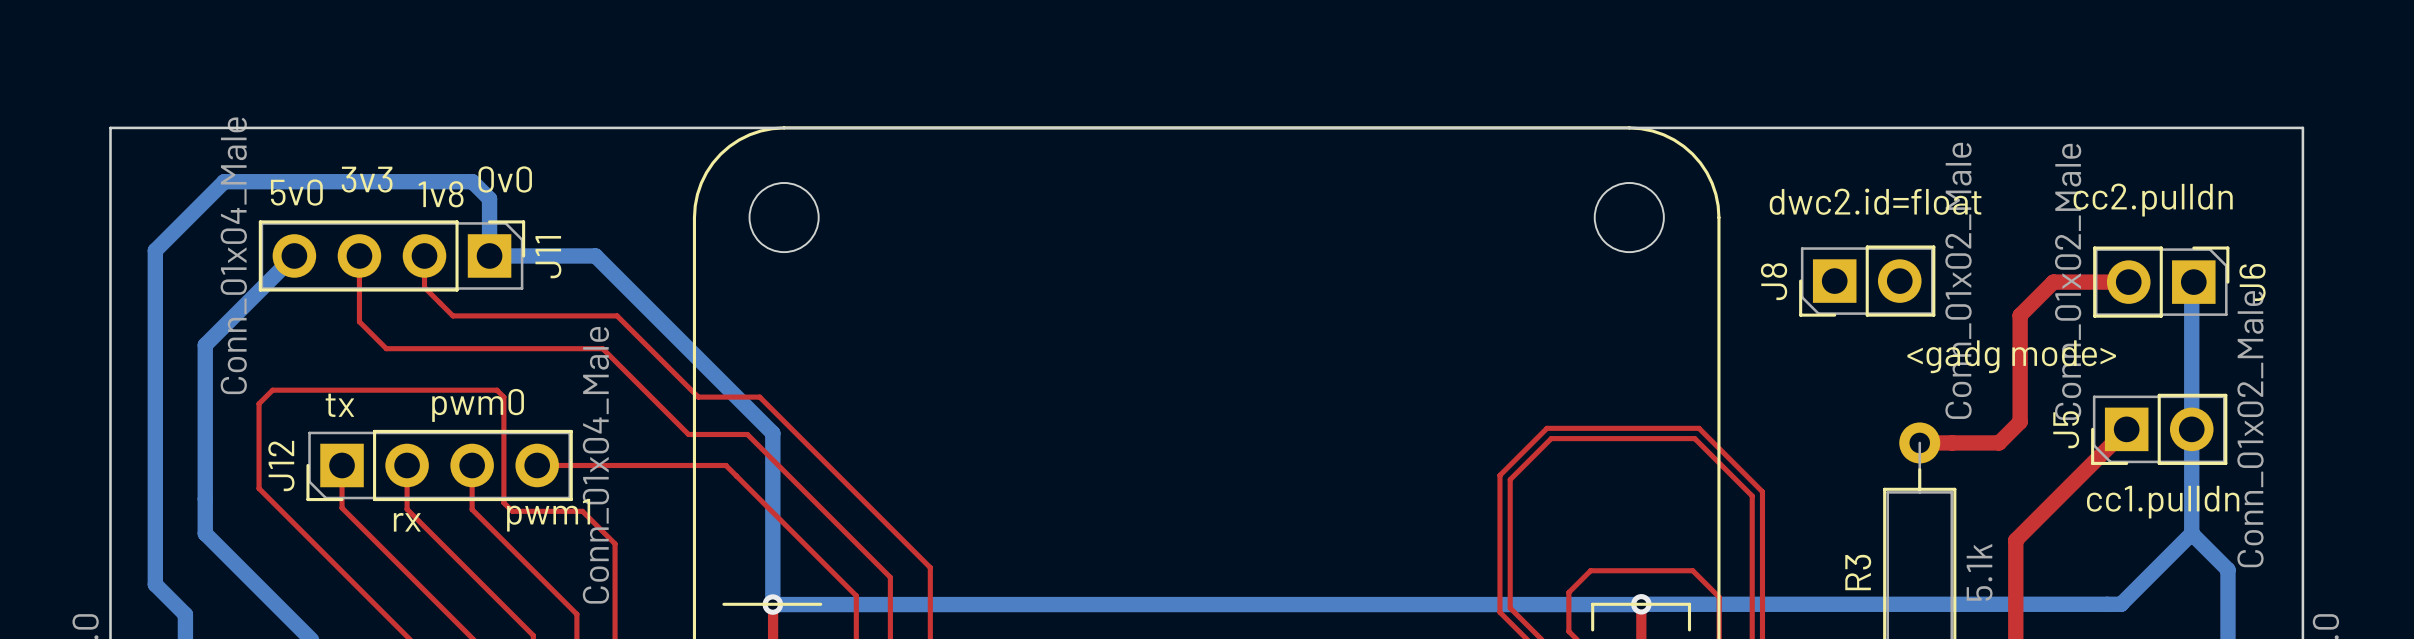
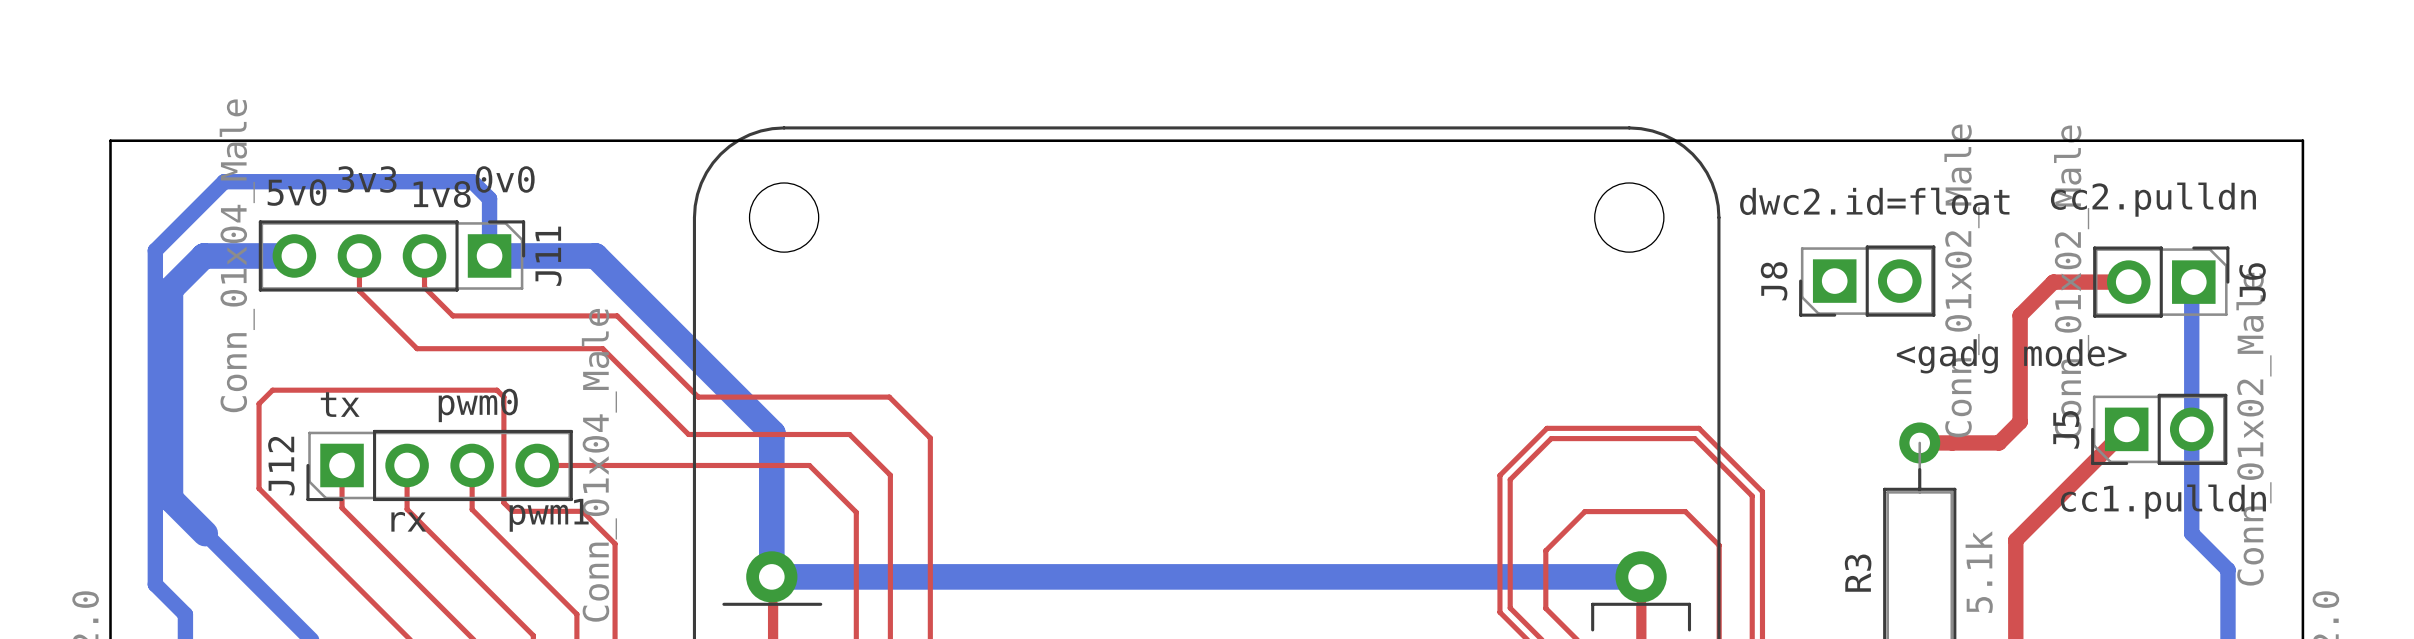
board edge: (110, 140) (110, 127) (2302, 127) (2302, 140) -> (110, 140) (2302, 140)
bottom track: (294, 255) (205, 345) (205, 533) -> (294, 255) (203, 255) (170, 289) (170, 498) (205, 533)
bottom track width: thin (489, 255) (595, 255) (772, 433) -> thick (489, 255) (595, 255) (772, 433)
top track: (359, 291) (359, 321) (386, 348) (417, 348) -> (359, 291) (417, 348)
top track: (759, 397) (930, 567) -> (759, 397) (889, 397) (930, 438) (930, 567)
bottom track: (772, 433) (772, 604) (1641, 604) -> (772, 433) (771, 576) (1641, 576)
top track: (747, 434) (890, 577) -> (747, 434) (849, 434) (890, 475) (890, 577)
top track: (725, 465) (856, 595) -> (725, 465) (809, 465) (856, 512) (856, 595)
bottom track: (2191, 533) (2121, 604) (1641, 604) -> none
via: none -> (771, 576)
via: none -> (1641, 576)
top track: (1719, 597) (1692, 570) (1590, 570) (1568, 592) (1568, 631) -> (1719, 597) (1719, 545) (1685, 511) (1584, 511) (1545, 550) (1545, 608) (1568, 631)
via: (772, 604) -> none
via: (1641, 604) -> none

